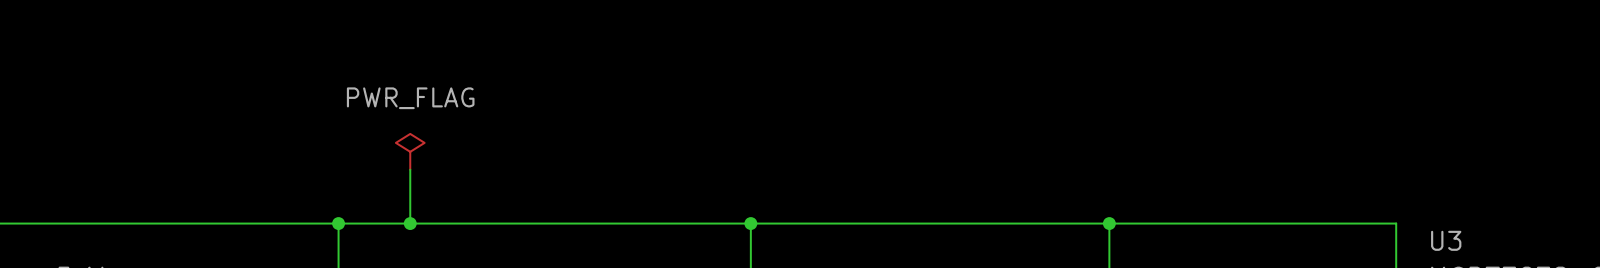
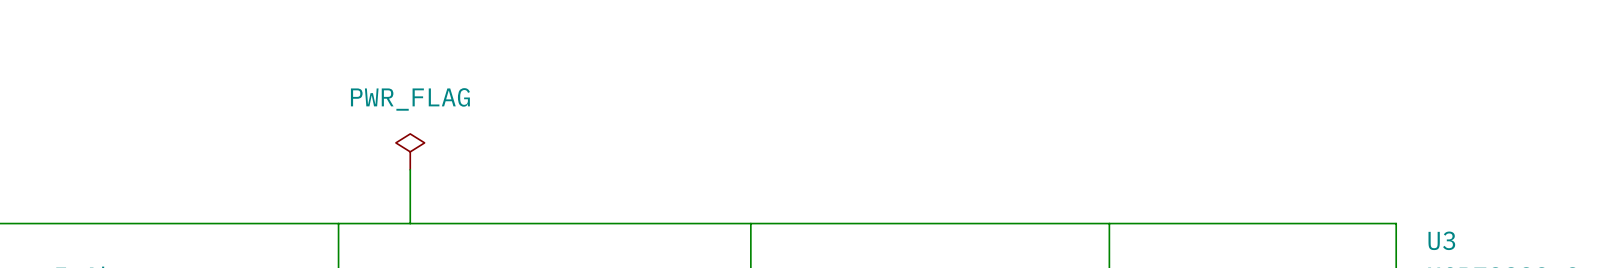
junction: (338, 223) -> none
junction: (410, 223) -> none
junction: (750, 223) -> none
junction: (1109, 223) -> none

